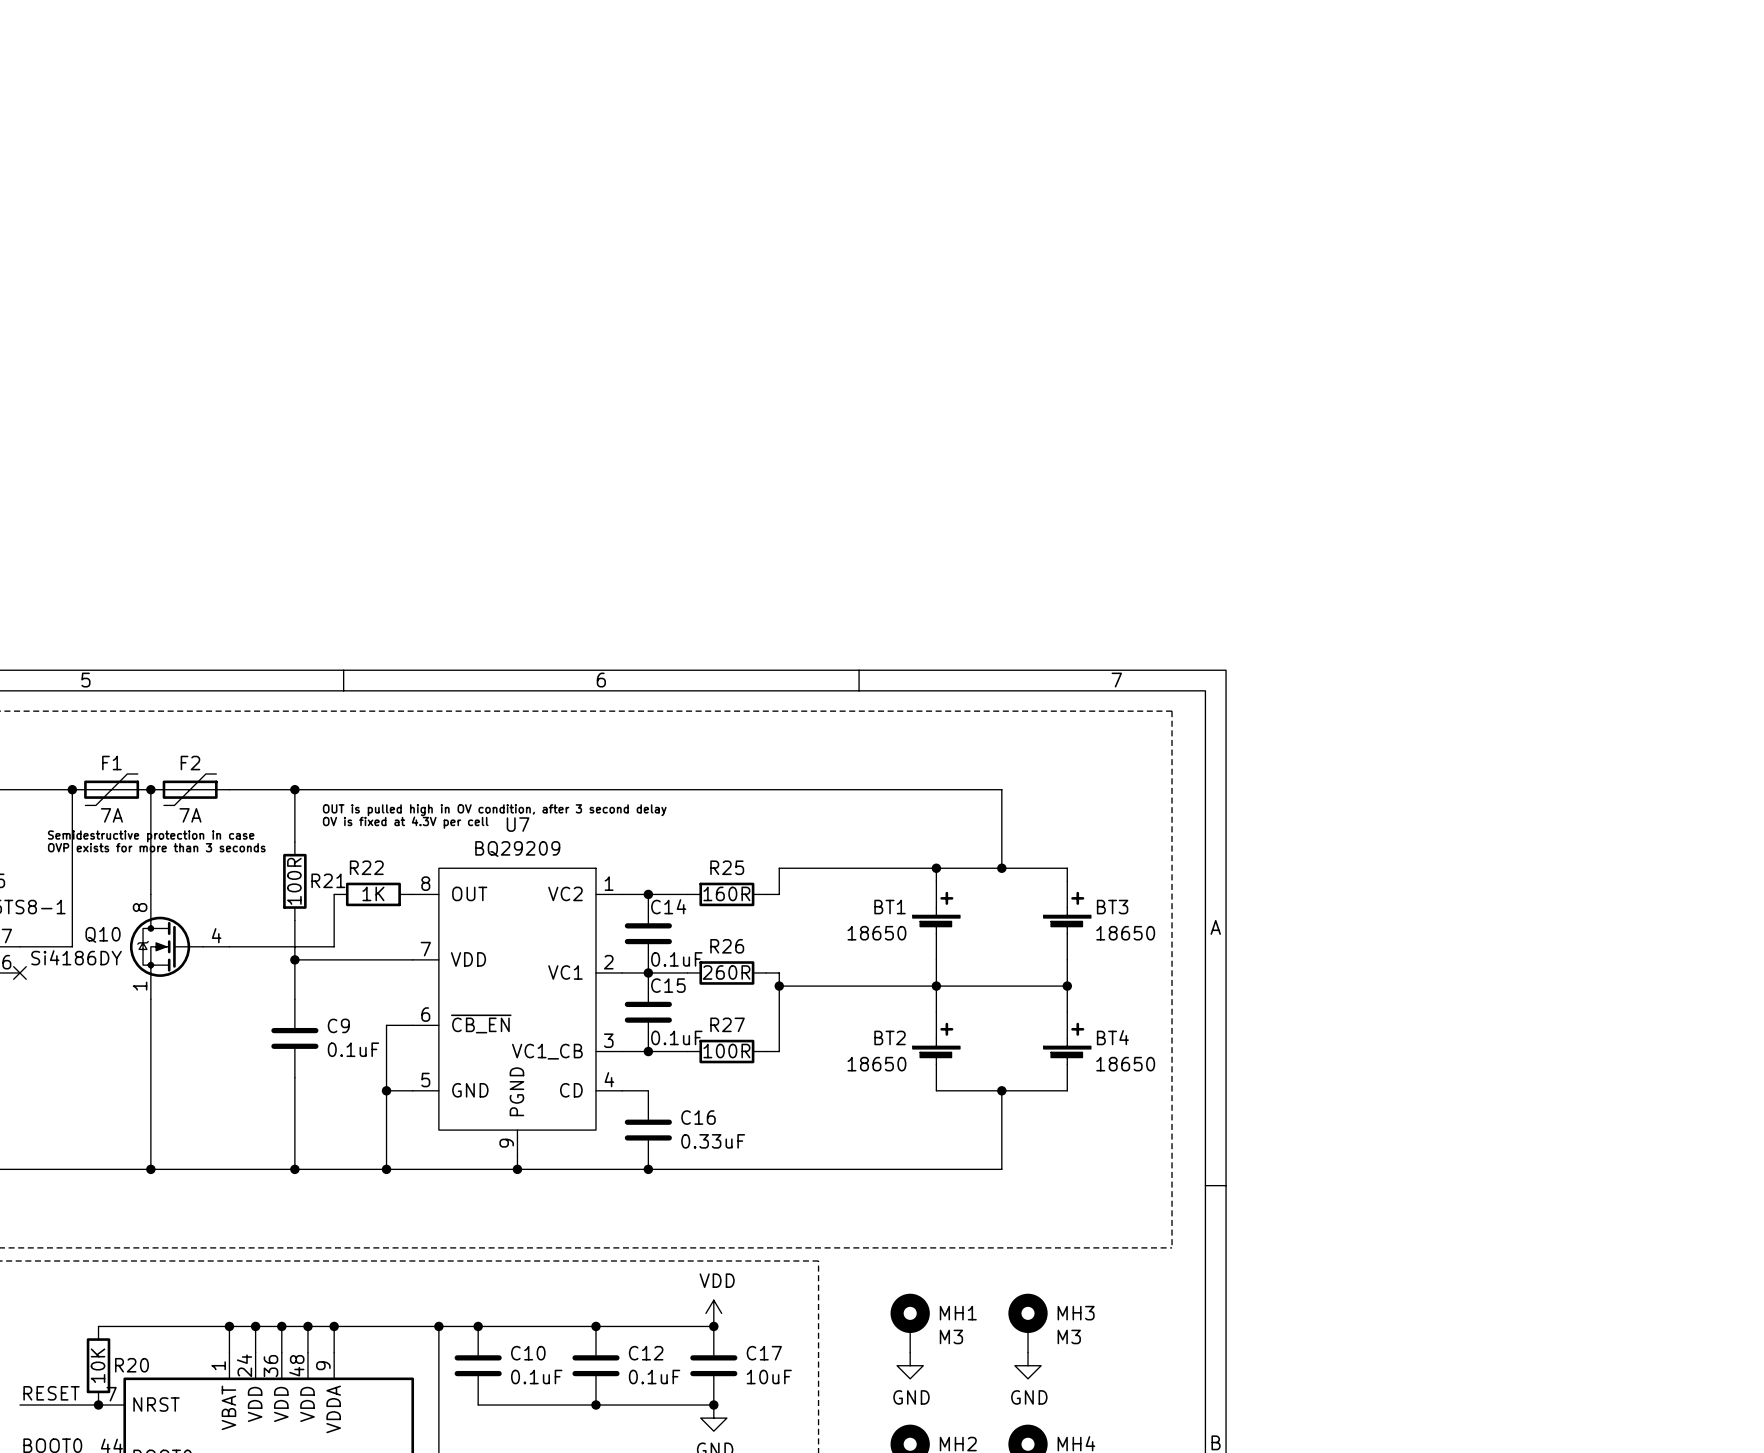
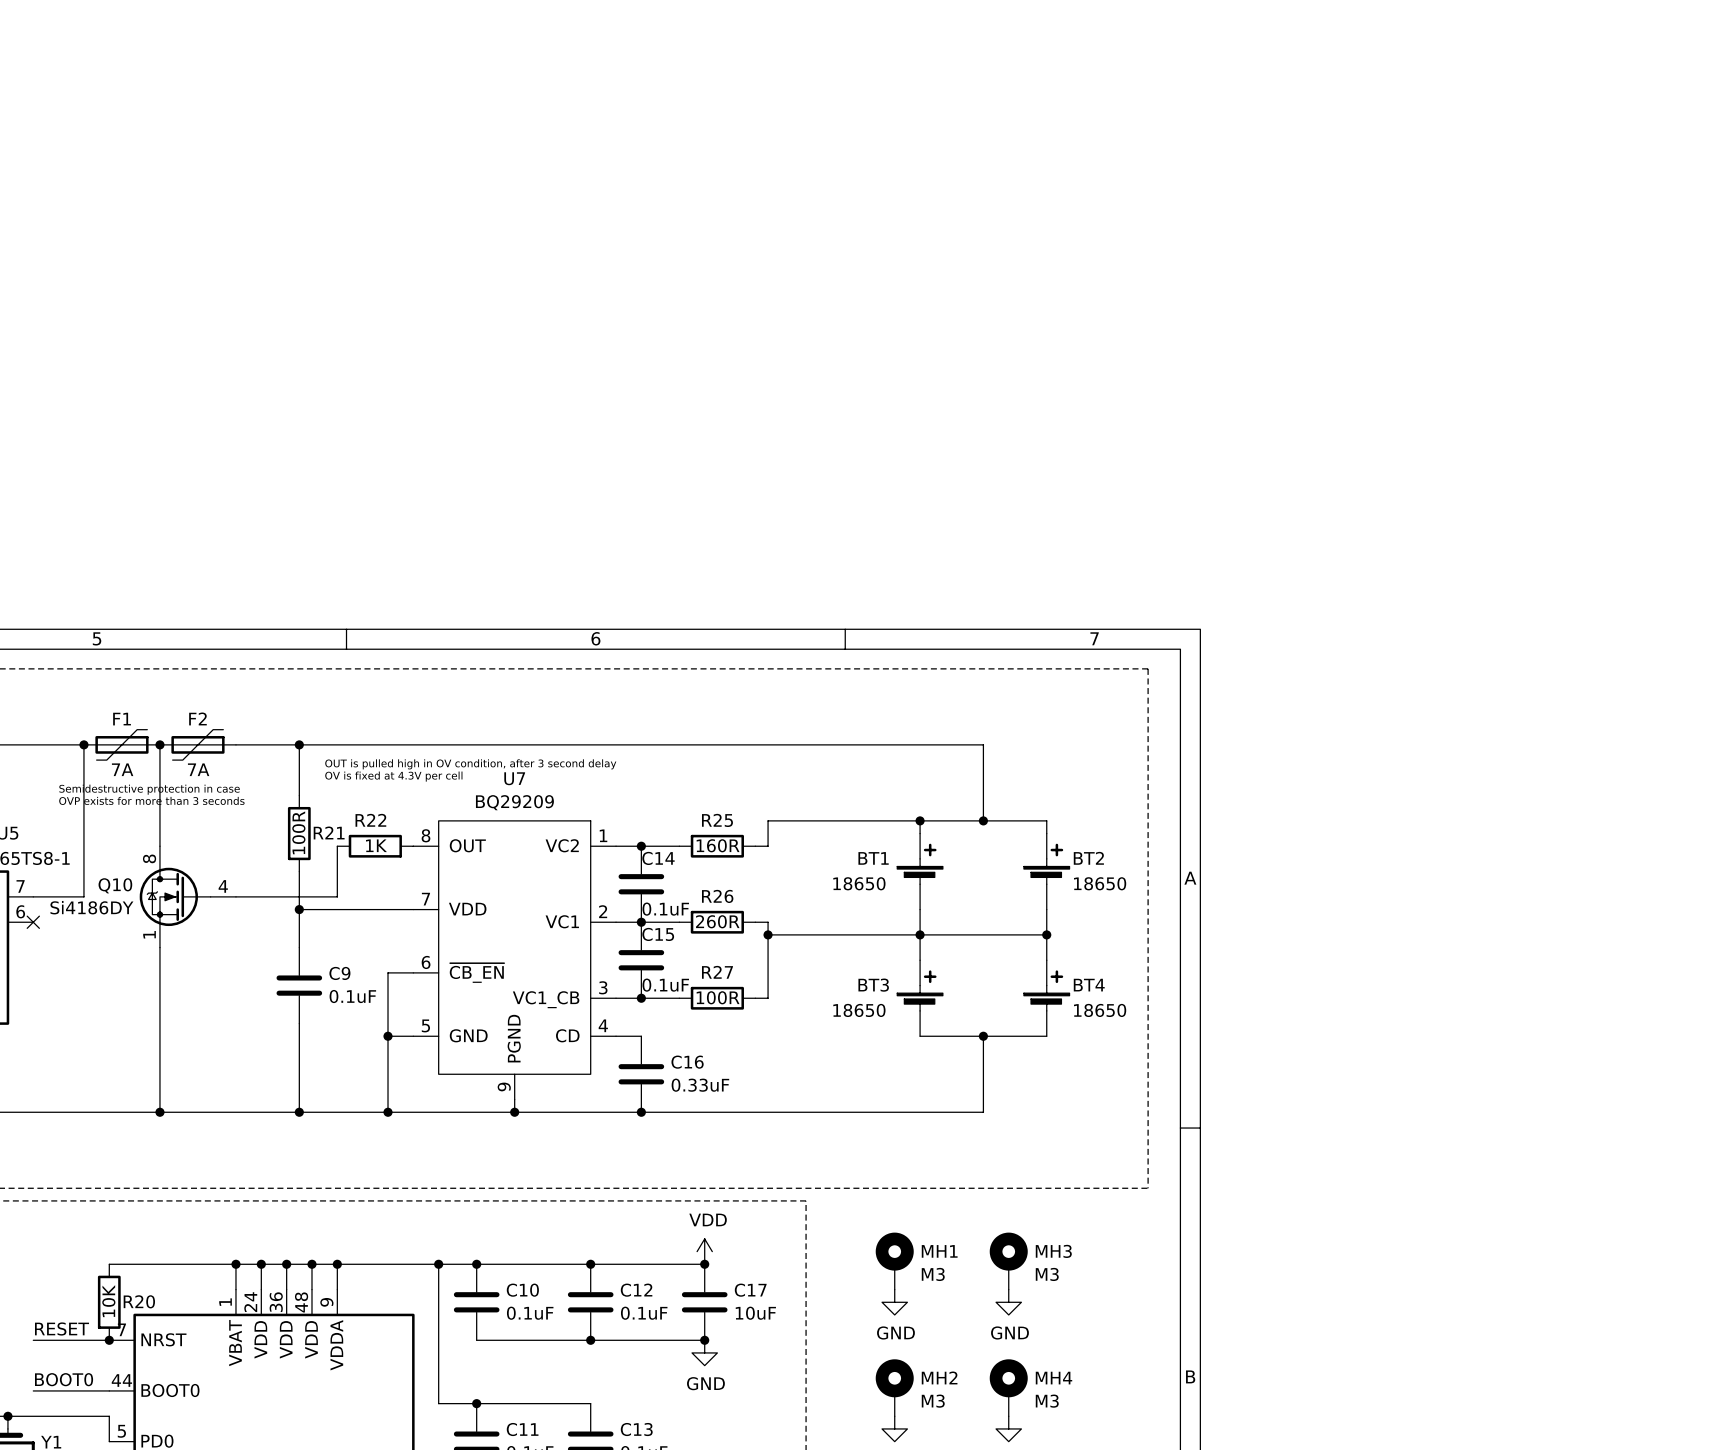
BT3 name: BT3 (1112, 907) -> BT2 (1088, 858)
BT2 name: BT2 (890, 1037) -> BT3 (873, 985)

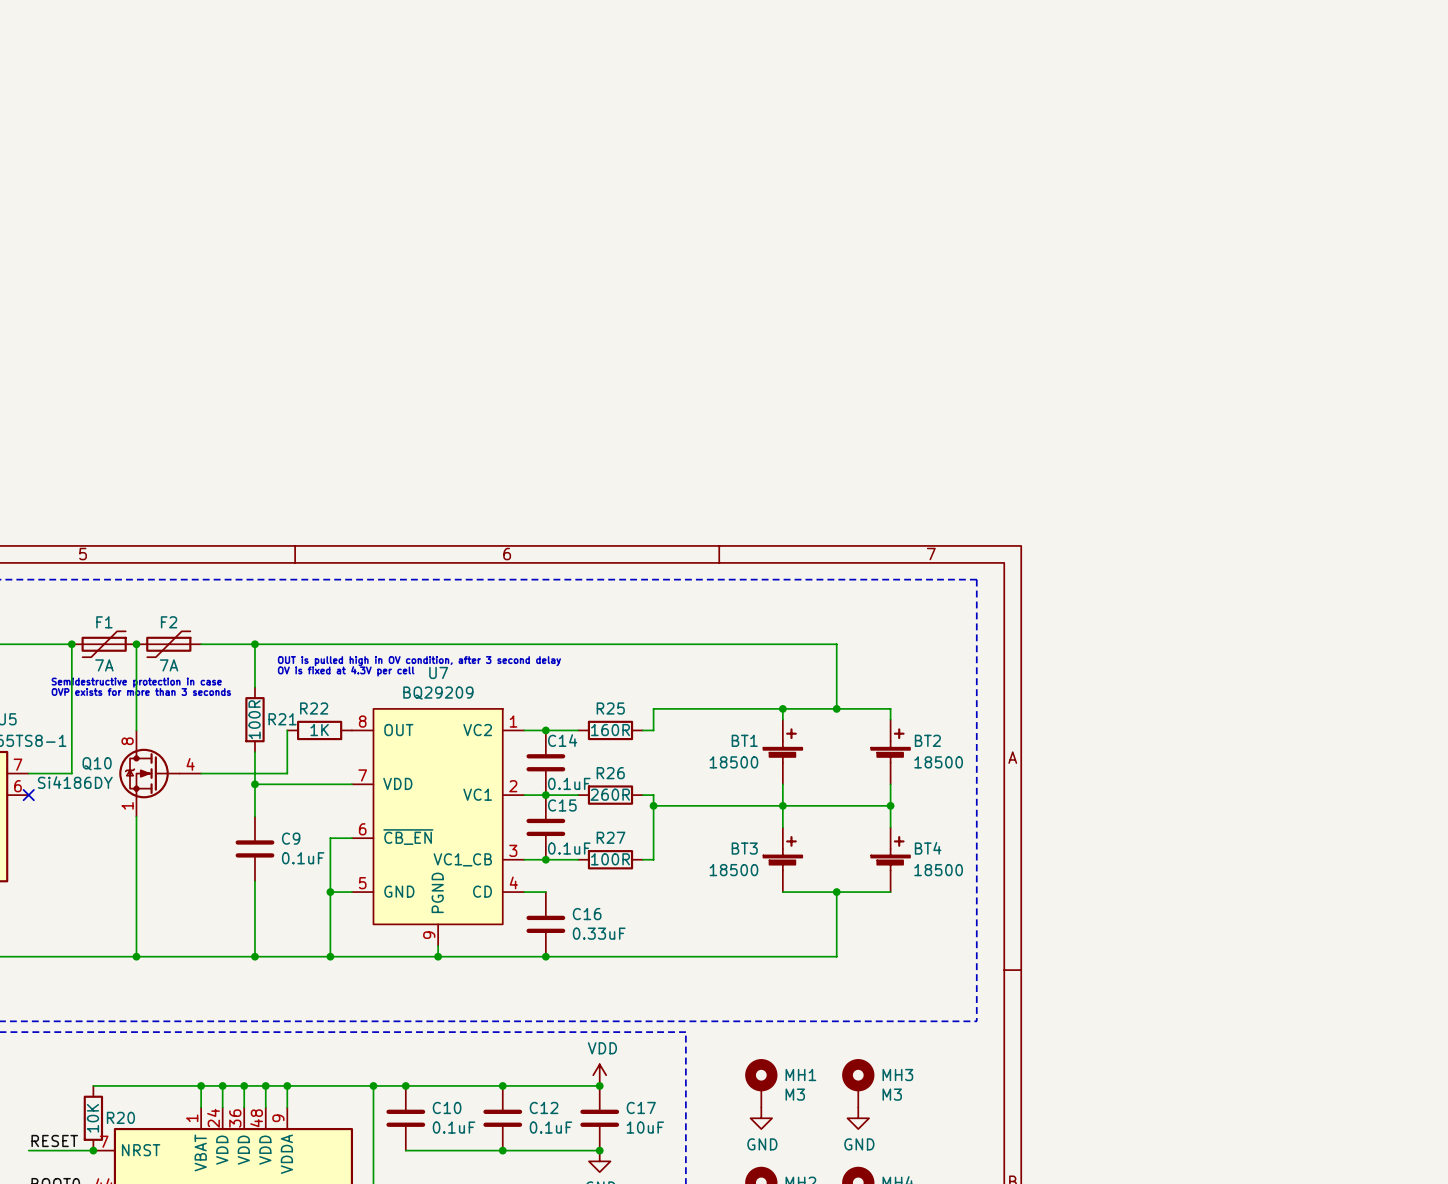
BT1 value: 18650 (859, 883) -> 18500 (733, 762)
BT2 value: 18650 (1100, 883) -> 18500 (938, 762)
BT3 value: 18650 (859, 1010) -> 18500 (733, 870)
BT4 value: 18650 (1100, 1010) -> 18500 (938, 870)

